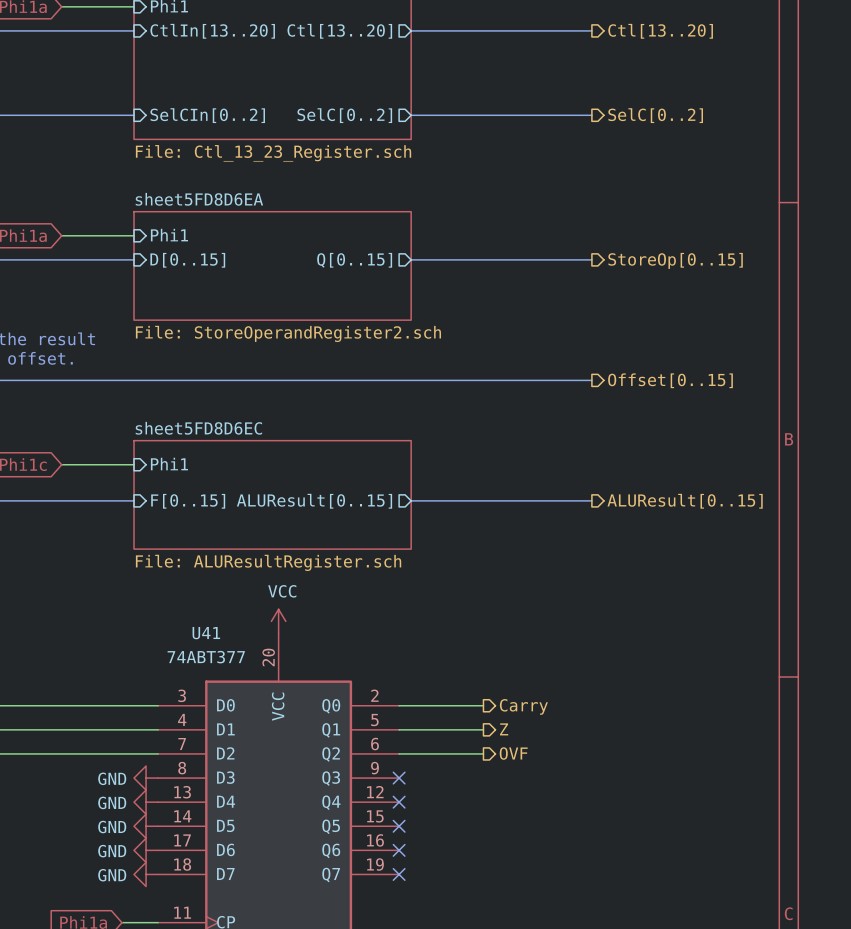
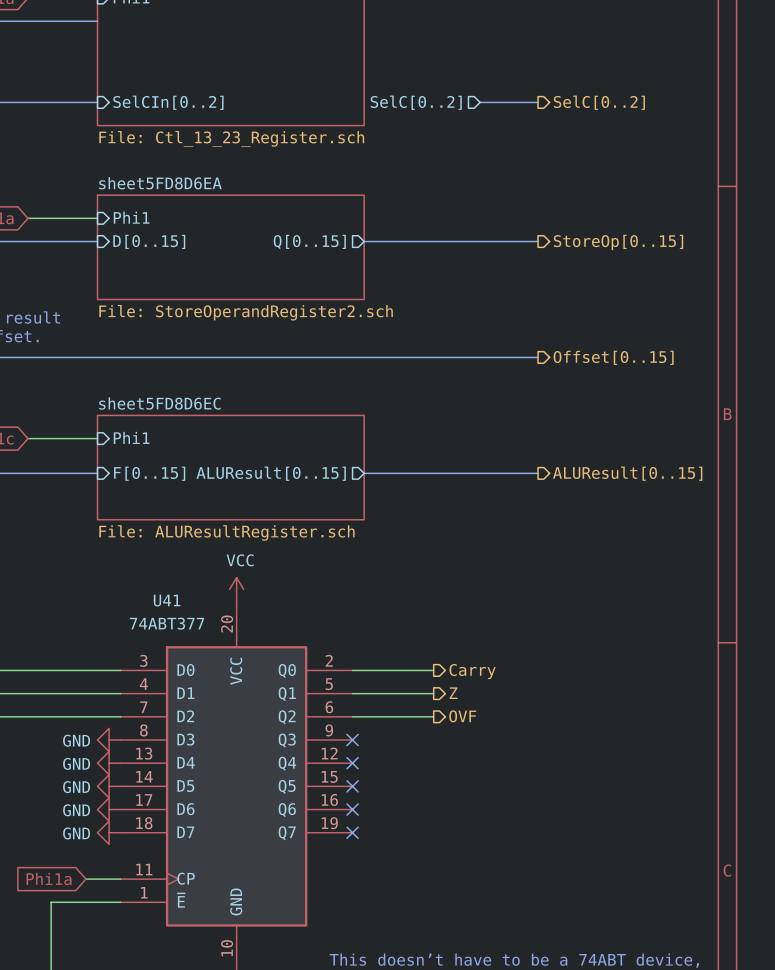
bus: (411, 30) (591, 30) -> none
sheet pin: CtlIn[13..20] (212, 31) -> none
sheet pin: Ctl[13..20] (339, 31) -> none
hierarchical label: Ctl[13..20] (660, 31) -> none
sheet pin position: SelC[0..2] (344, 115) -> SelC[0..2] (416, 102)
bus: (411, 115) (531, 115) -> none

